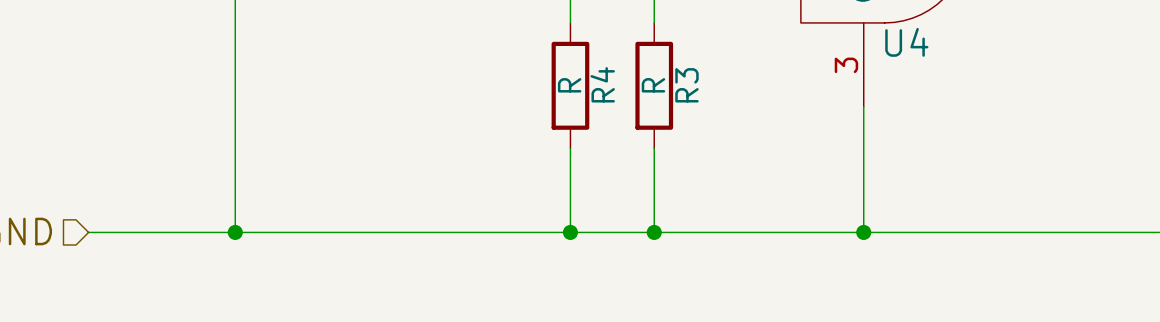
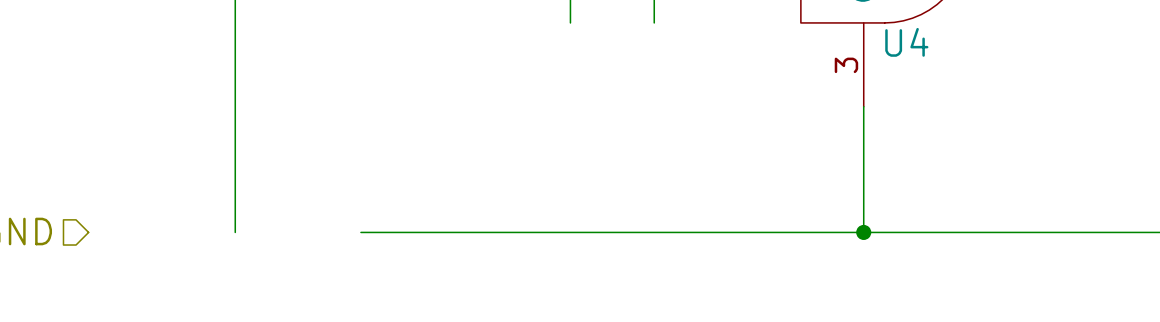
R4: R (570, 85) -> none
R3: R (654, 85) -> none
wire: (570, 148) (570, 232) -> none
wire: (654, 148) (654, 232) -> none
wire: (88, 232) (360, 232) -> none
junction: (235, 232) -> none
junction: (570, 232) -> none
junction: (654, 232) -> none

